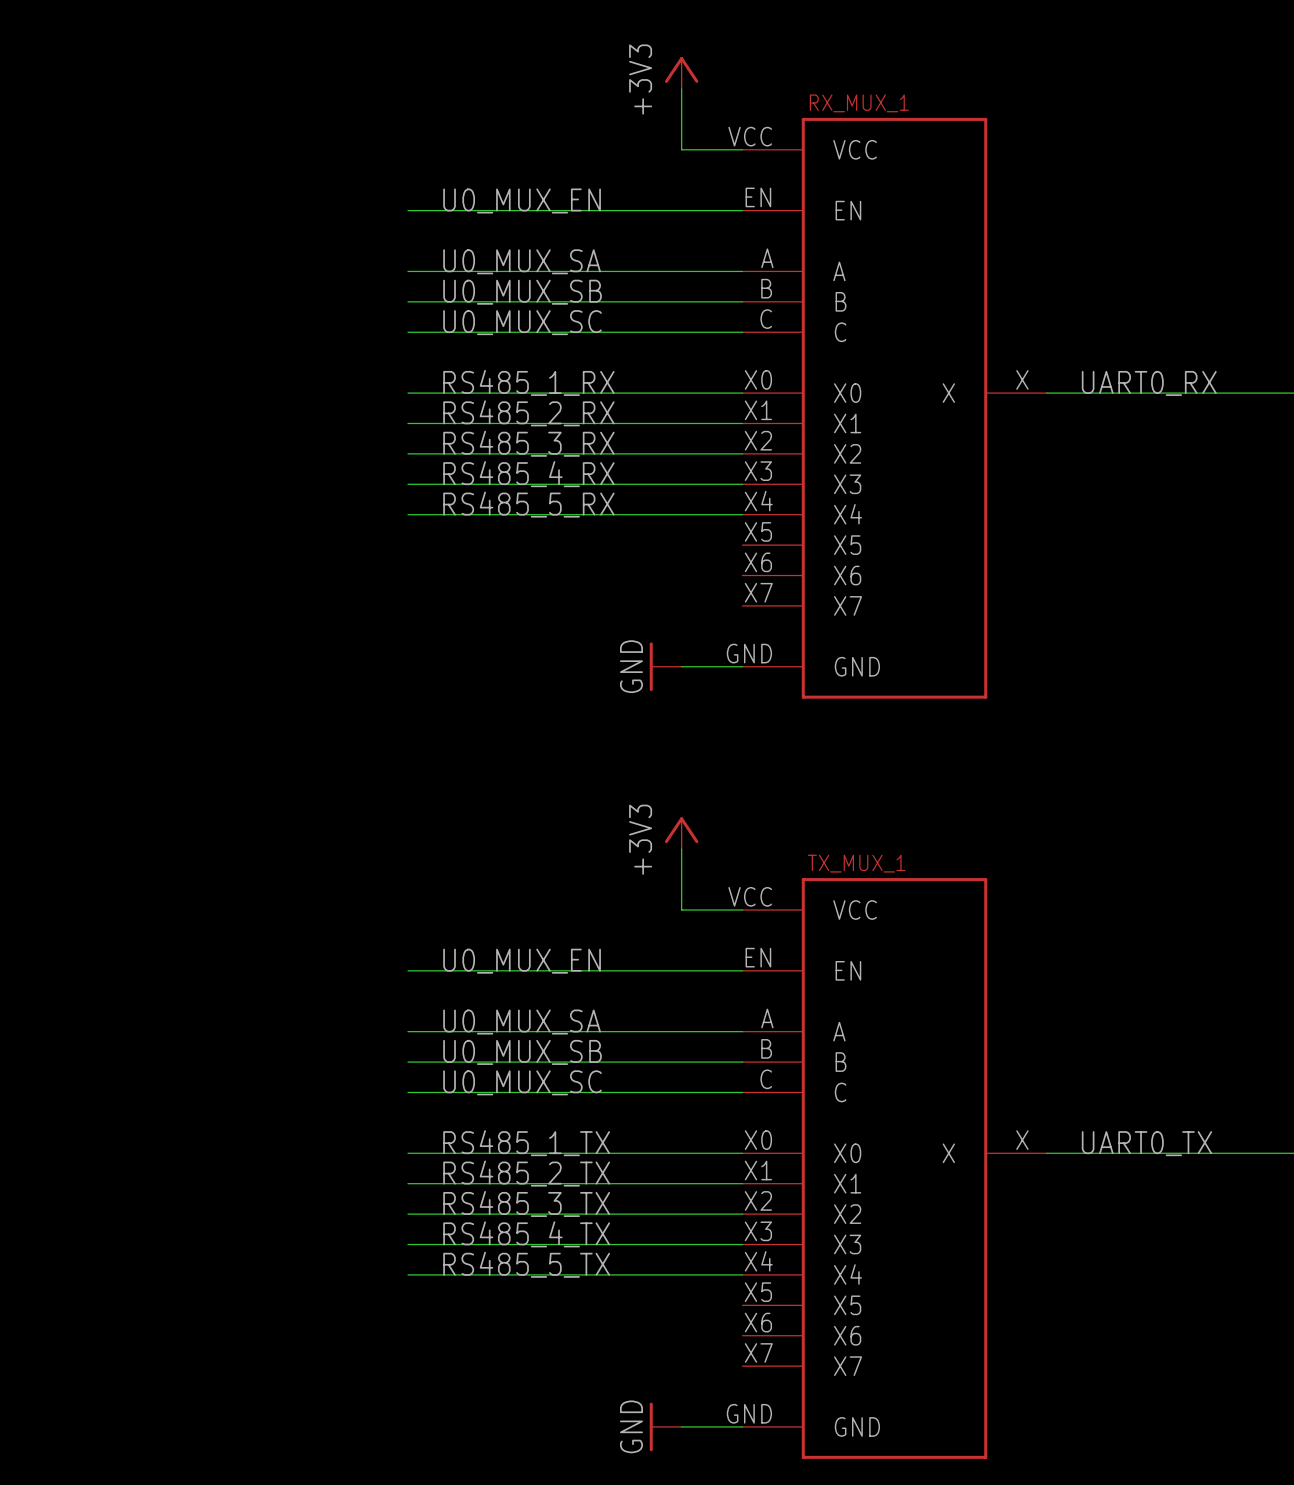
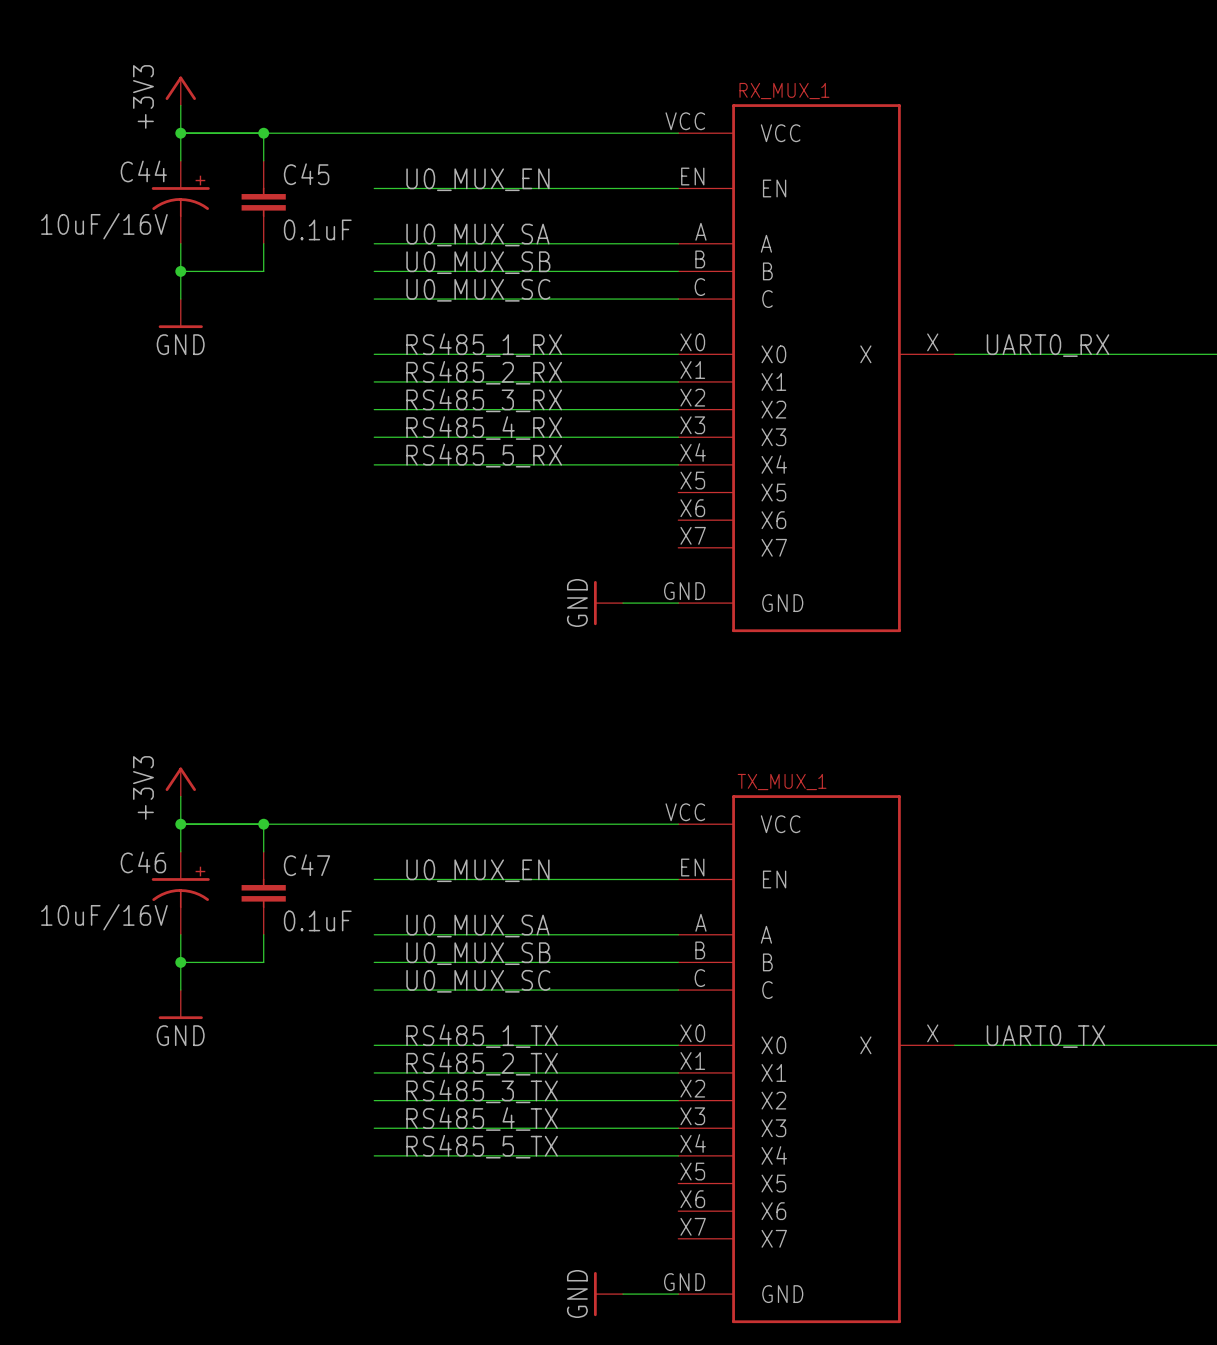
power symbol: +3V3 (681, 73) -> none
wire: (681, 88) (681, 149) -> (180, 133) (623, 133)
power symbol: none -> +3V3 (180, 91)
wire: none -> (180, 105) (180, 160)
junction: none -> (180, 133)
wire: none -> (263, 133) (263, 160)
junction: none -> (263, 133)
C44: none -> 10uF/16V (180, 202)
C45: none -> 0.1uF (263, 202)
wire: none -> (180, 243) (180, 299)
wire: none -> (263, 243) (263, 271) (180, 271)
junction: none -> (180, 271)
power symbol: none -> GND (180, 313)
power symbol: +3V3 (681, 833) -> none
wire: (681, 849) (681, 910) -> (180, 824) (623, 824)
power symbol: none -> +3V3 (180, 782)
wire: none -> (180, 796) (180, 851)
junction: none -> (180, 824)
wire: none -> (263, 824) (263, 851)
junction: none -> (263, 824)
C46: none -> 10uF/16V (180, 893)
C47: none -> 0.1uF (263, 893)
wire: none -> (180, 934) (180, 990)
wire: none -> (263, 934) (263, 962) (180, 962)
junction: none -> (180, 962)
power symbol: none -> GND (180, 1004)

